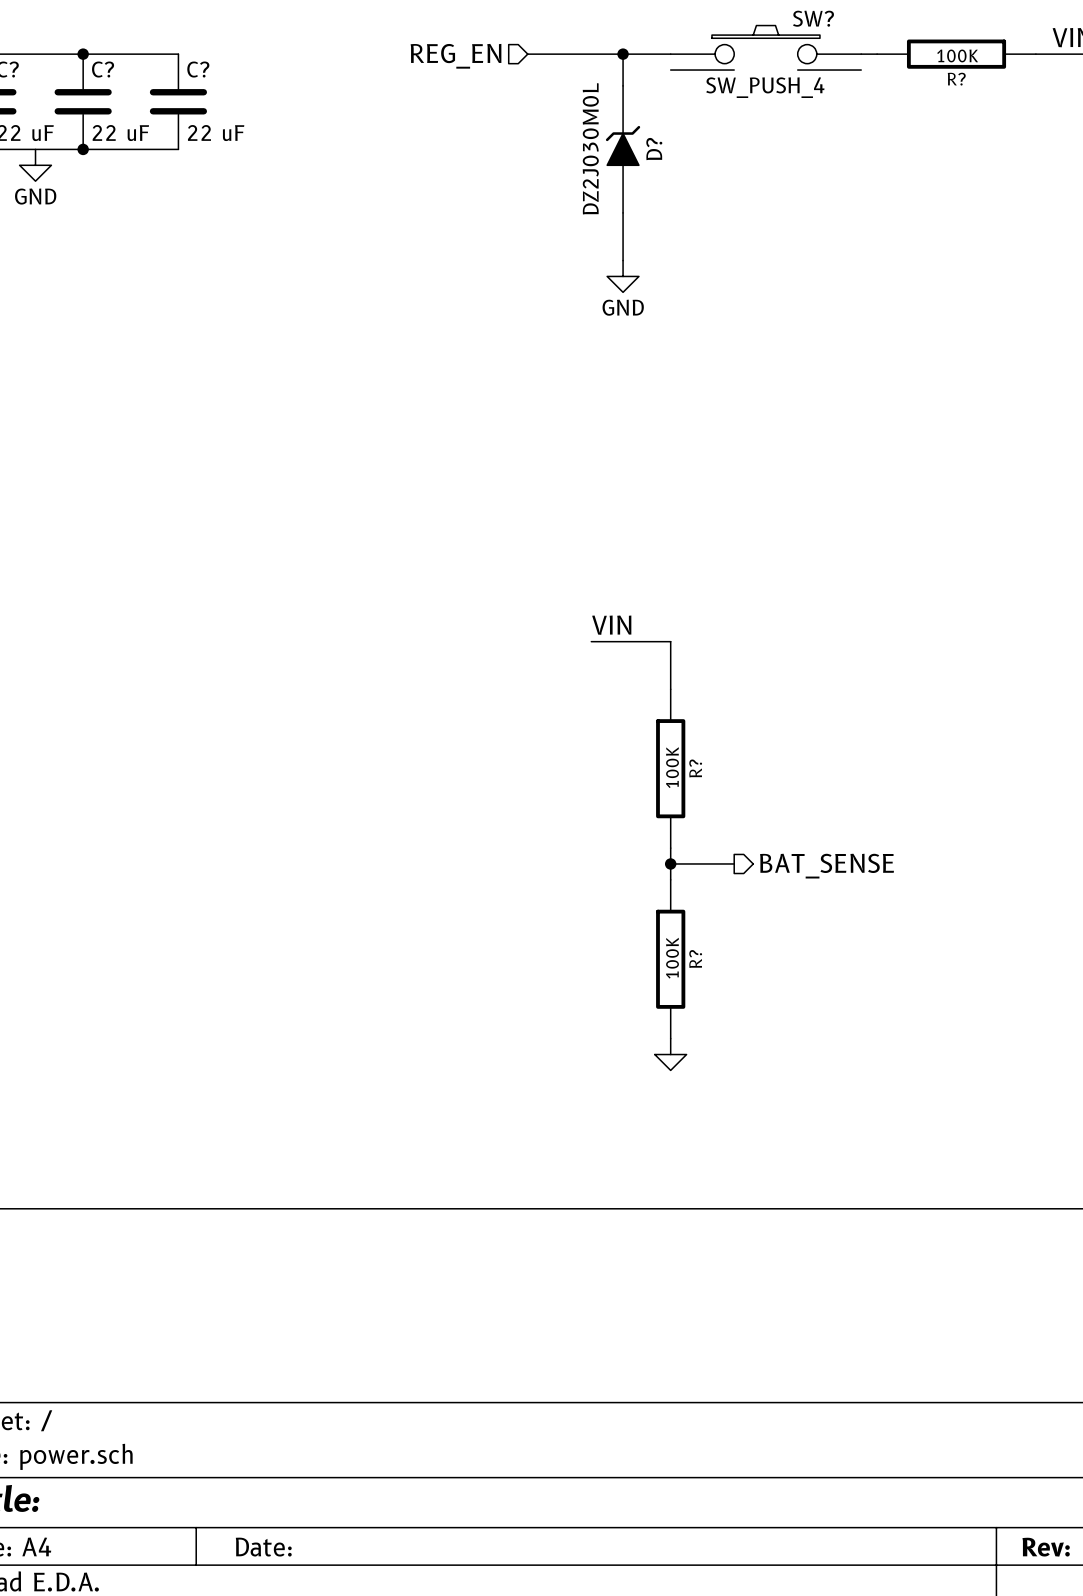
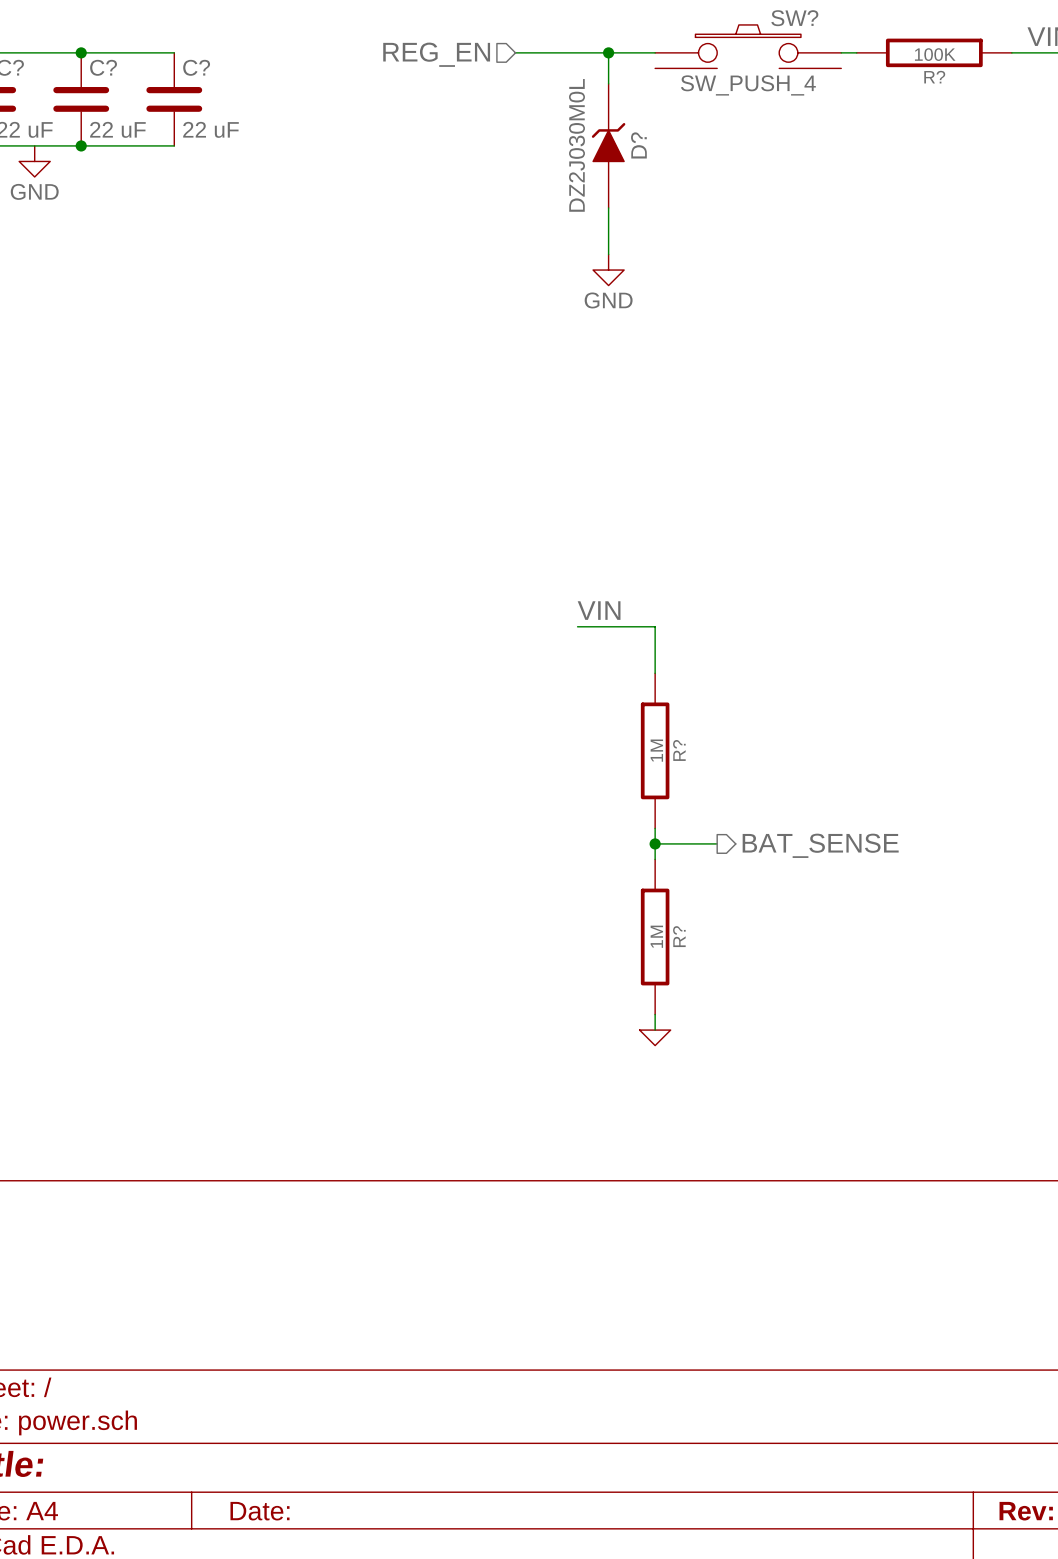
R? value: 100K (672, 767) -> 1M (656, 750)
R? value: 100K (672, 958) -> 1M (656, 936)

